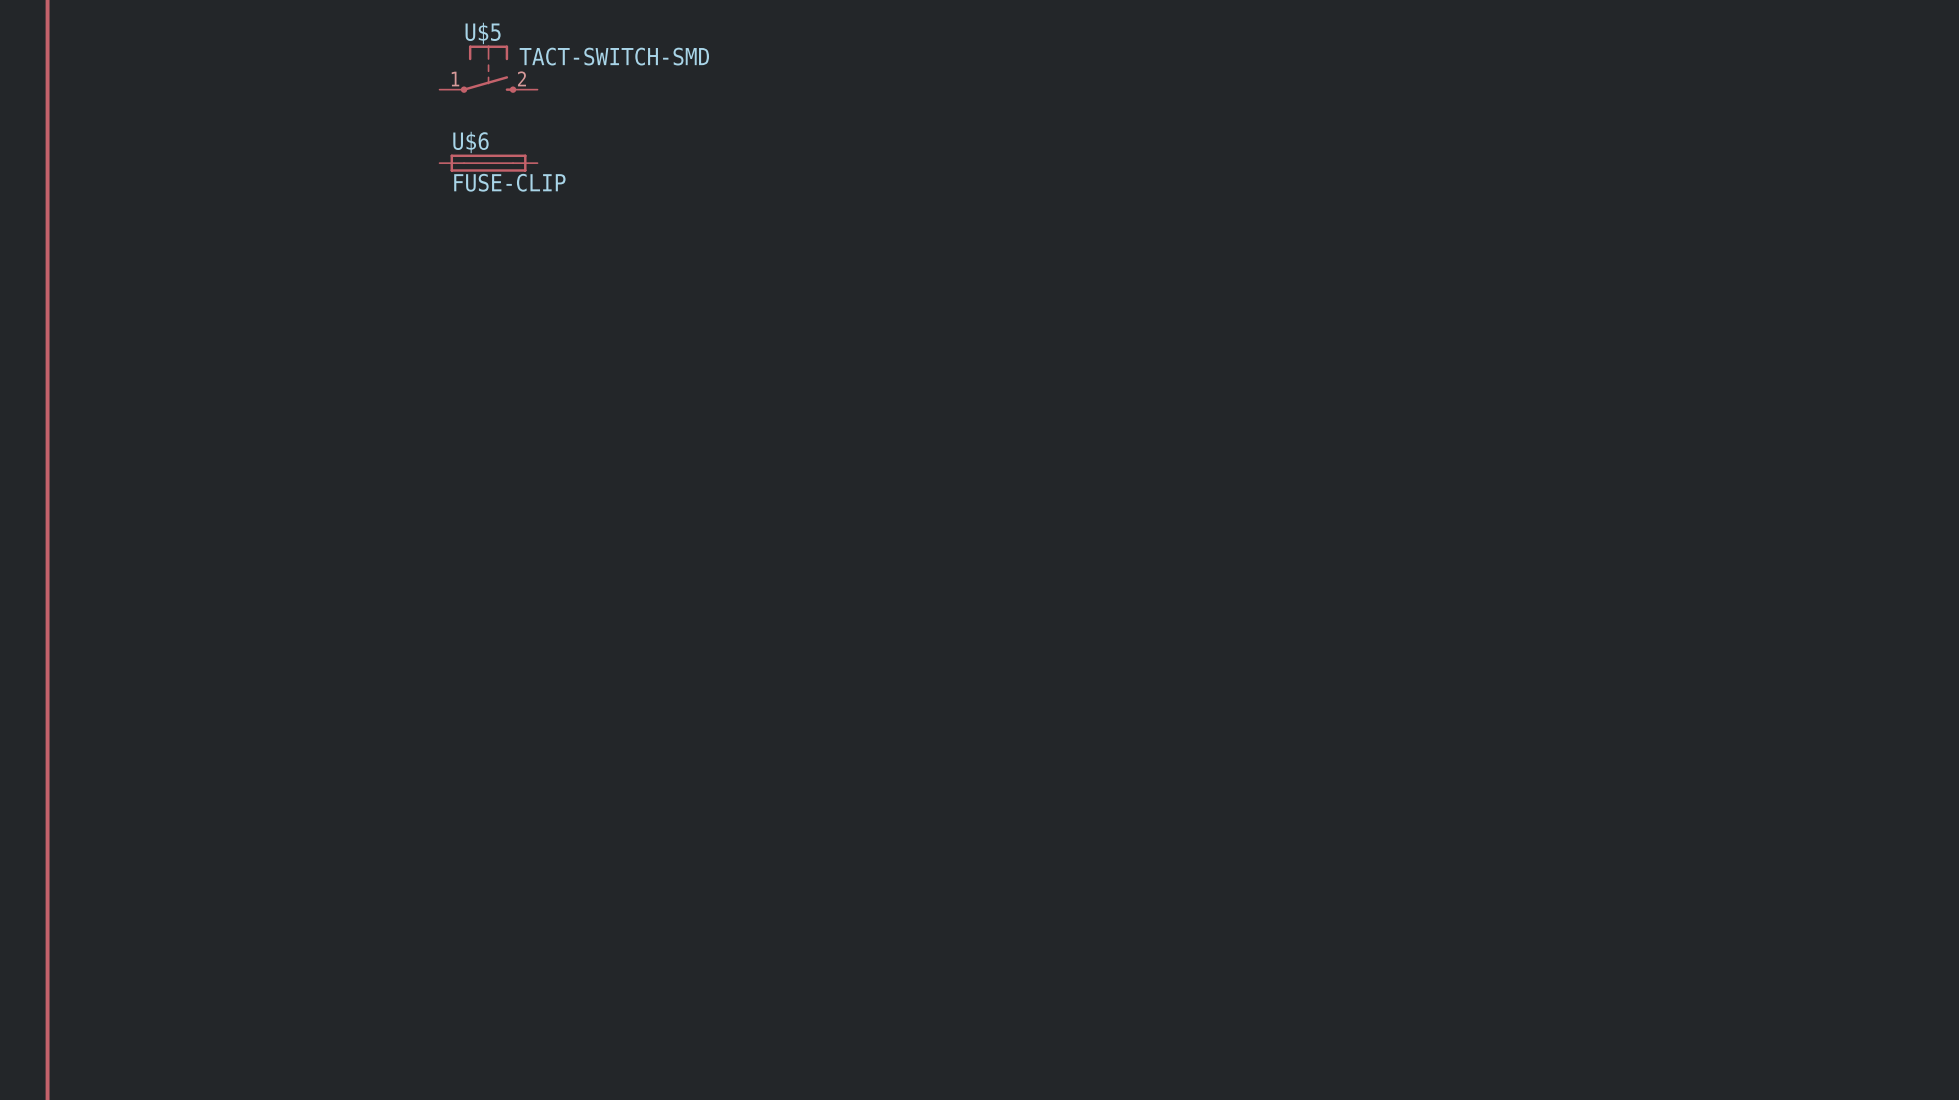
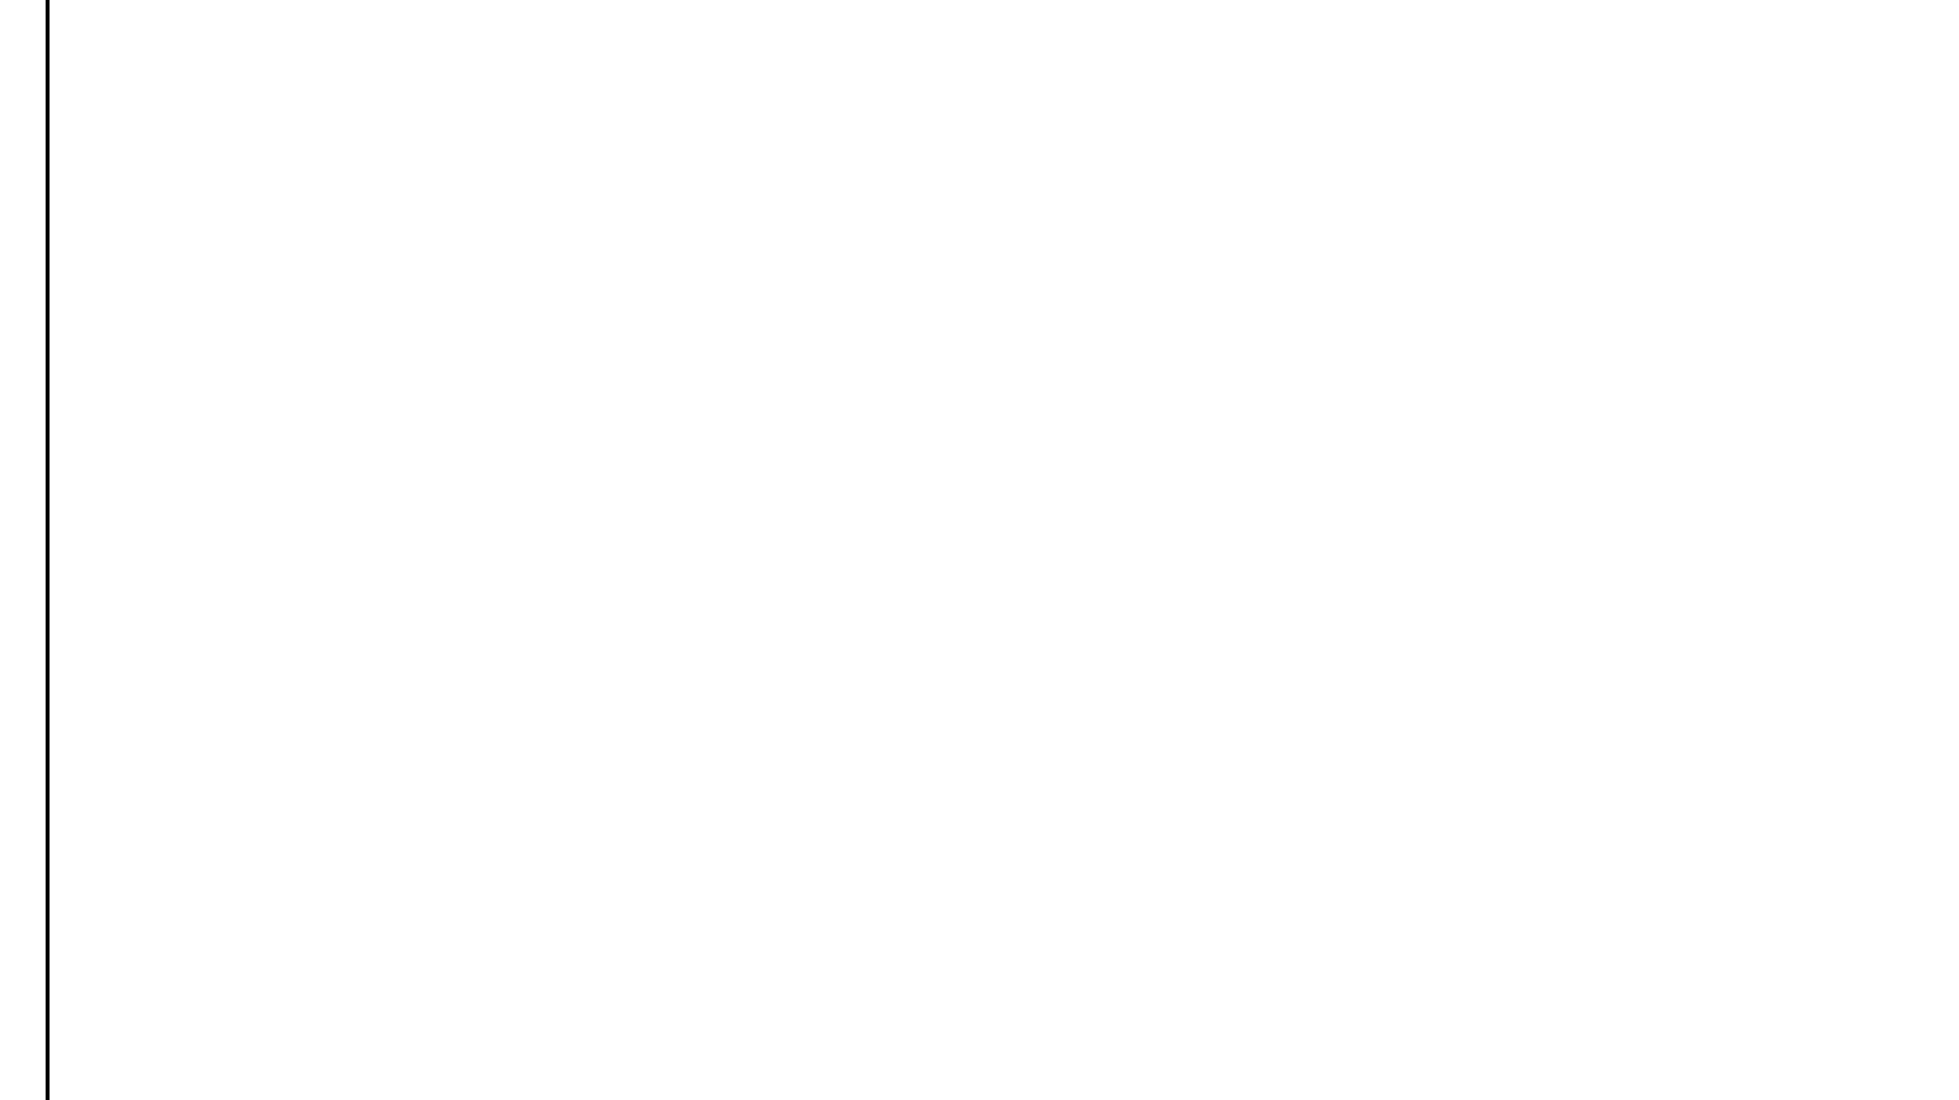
U$5: TACT-SWITCH-SMD (488, 69) -> none
U$6: FUSE-CLIP (488, 163) -> none

